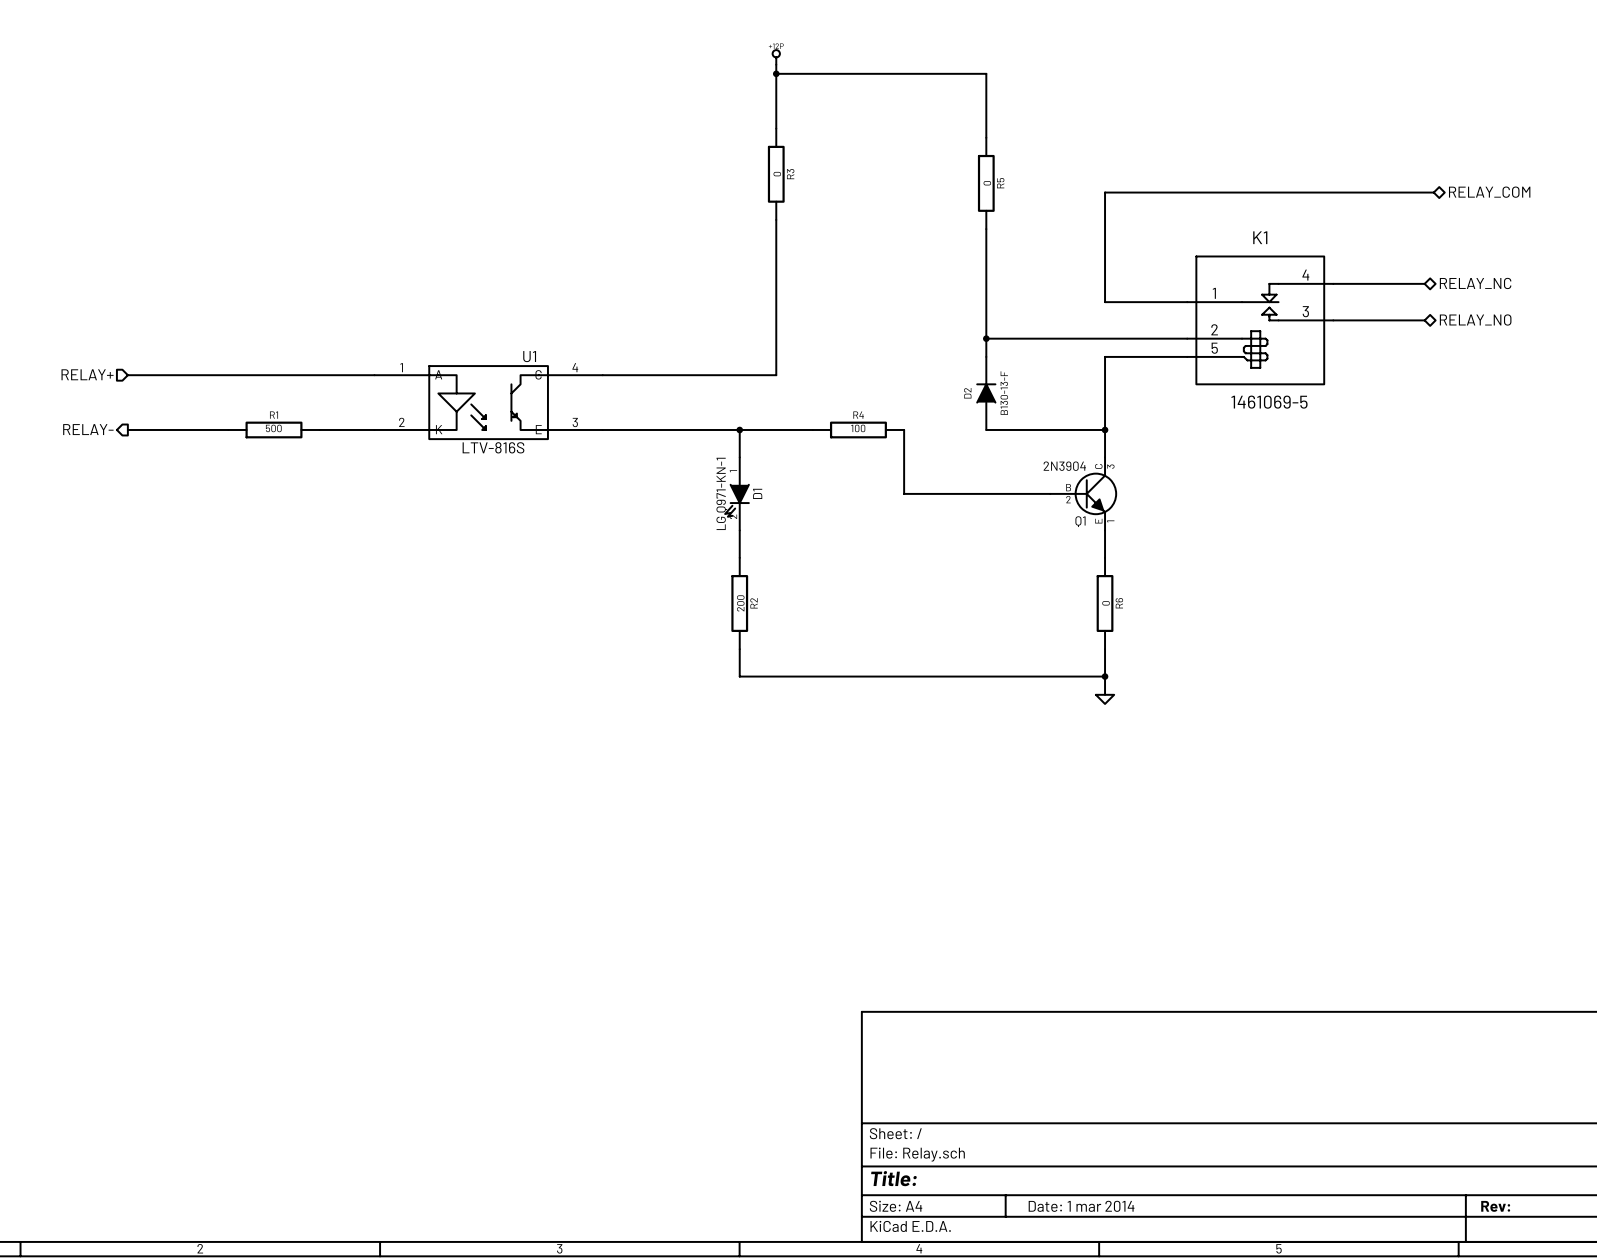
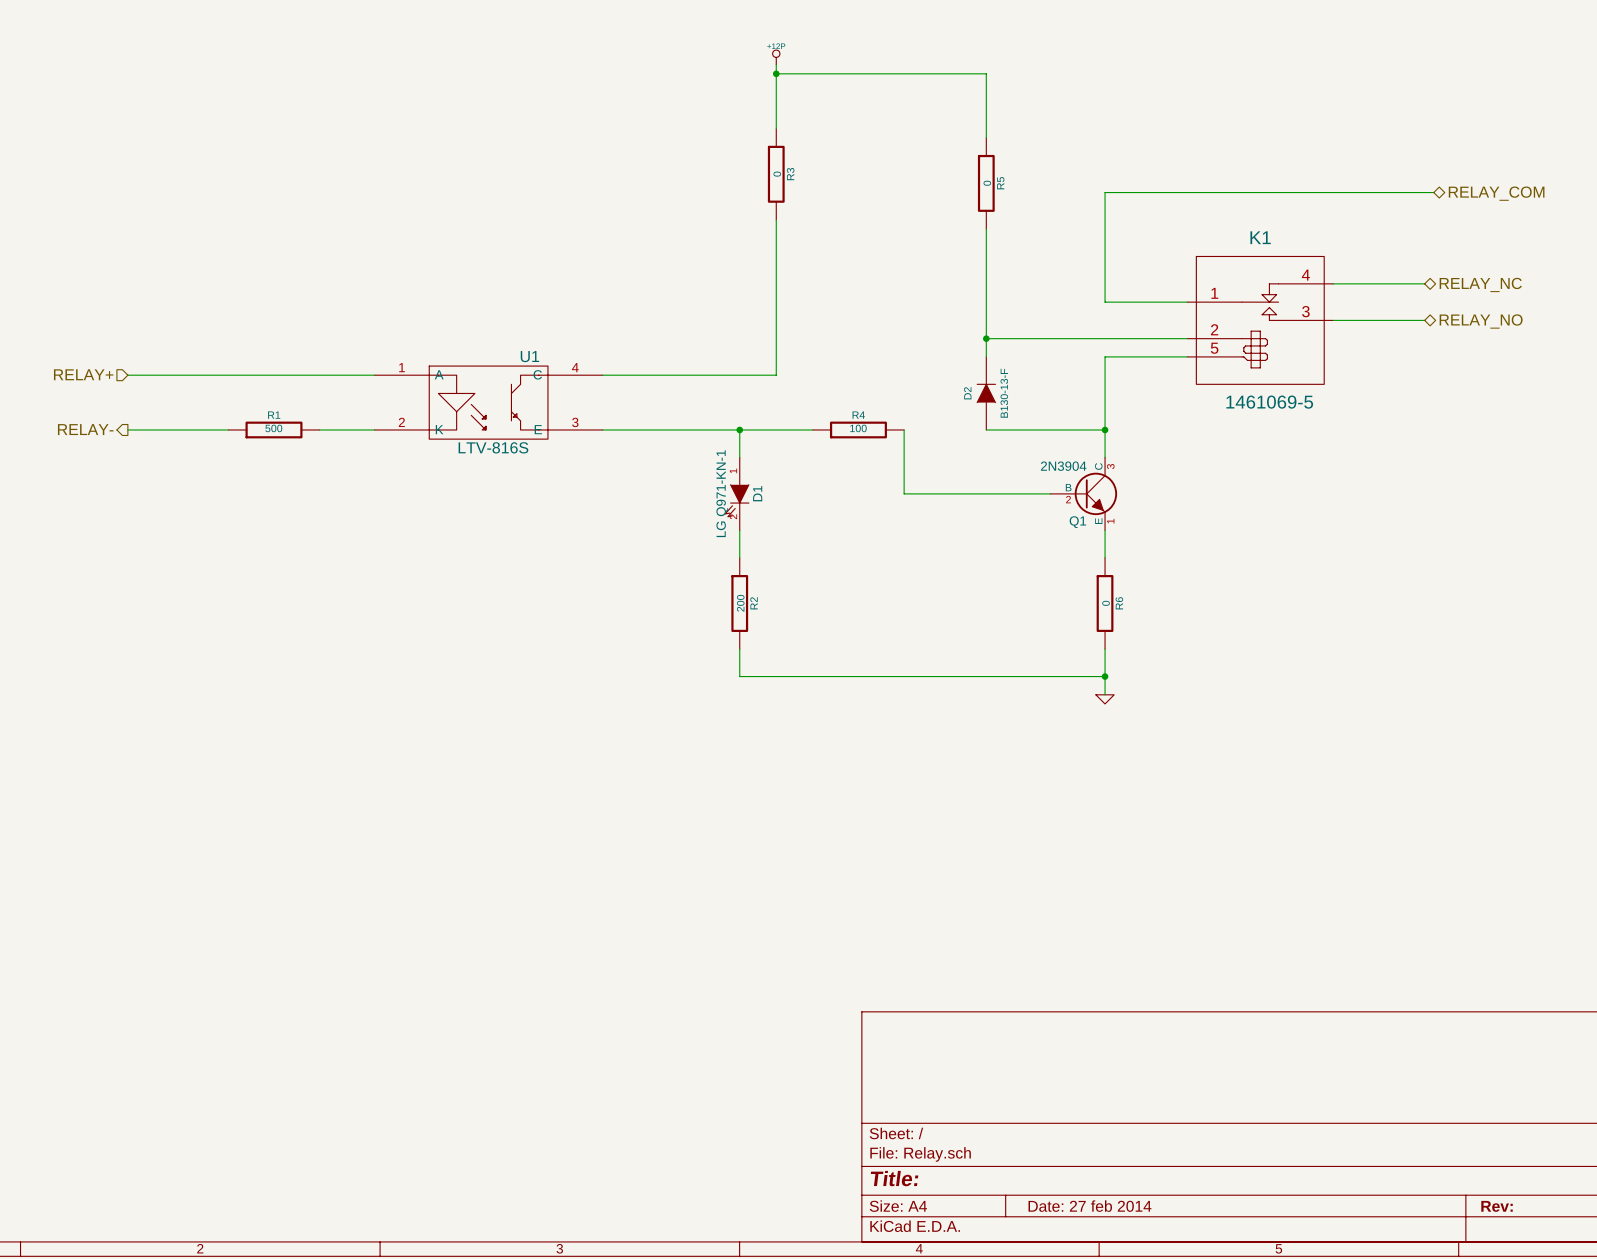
title block: Date: 1 mar 2014 (1081, 1206) -> Date: 27 feb 2014 (1089, 1206)

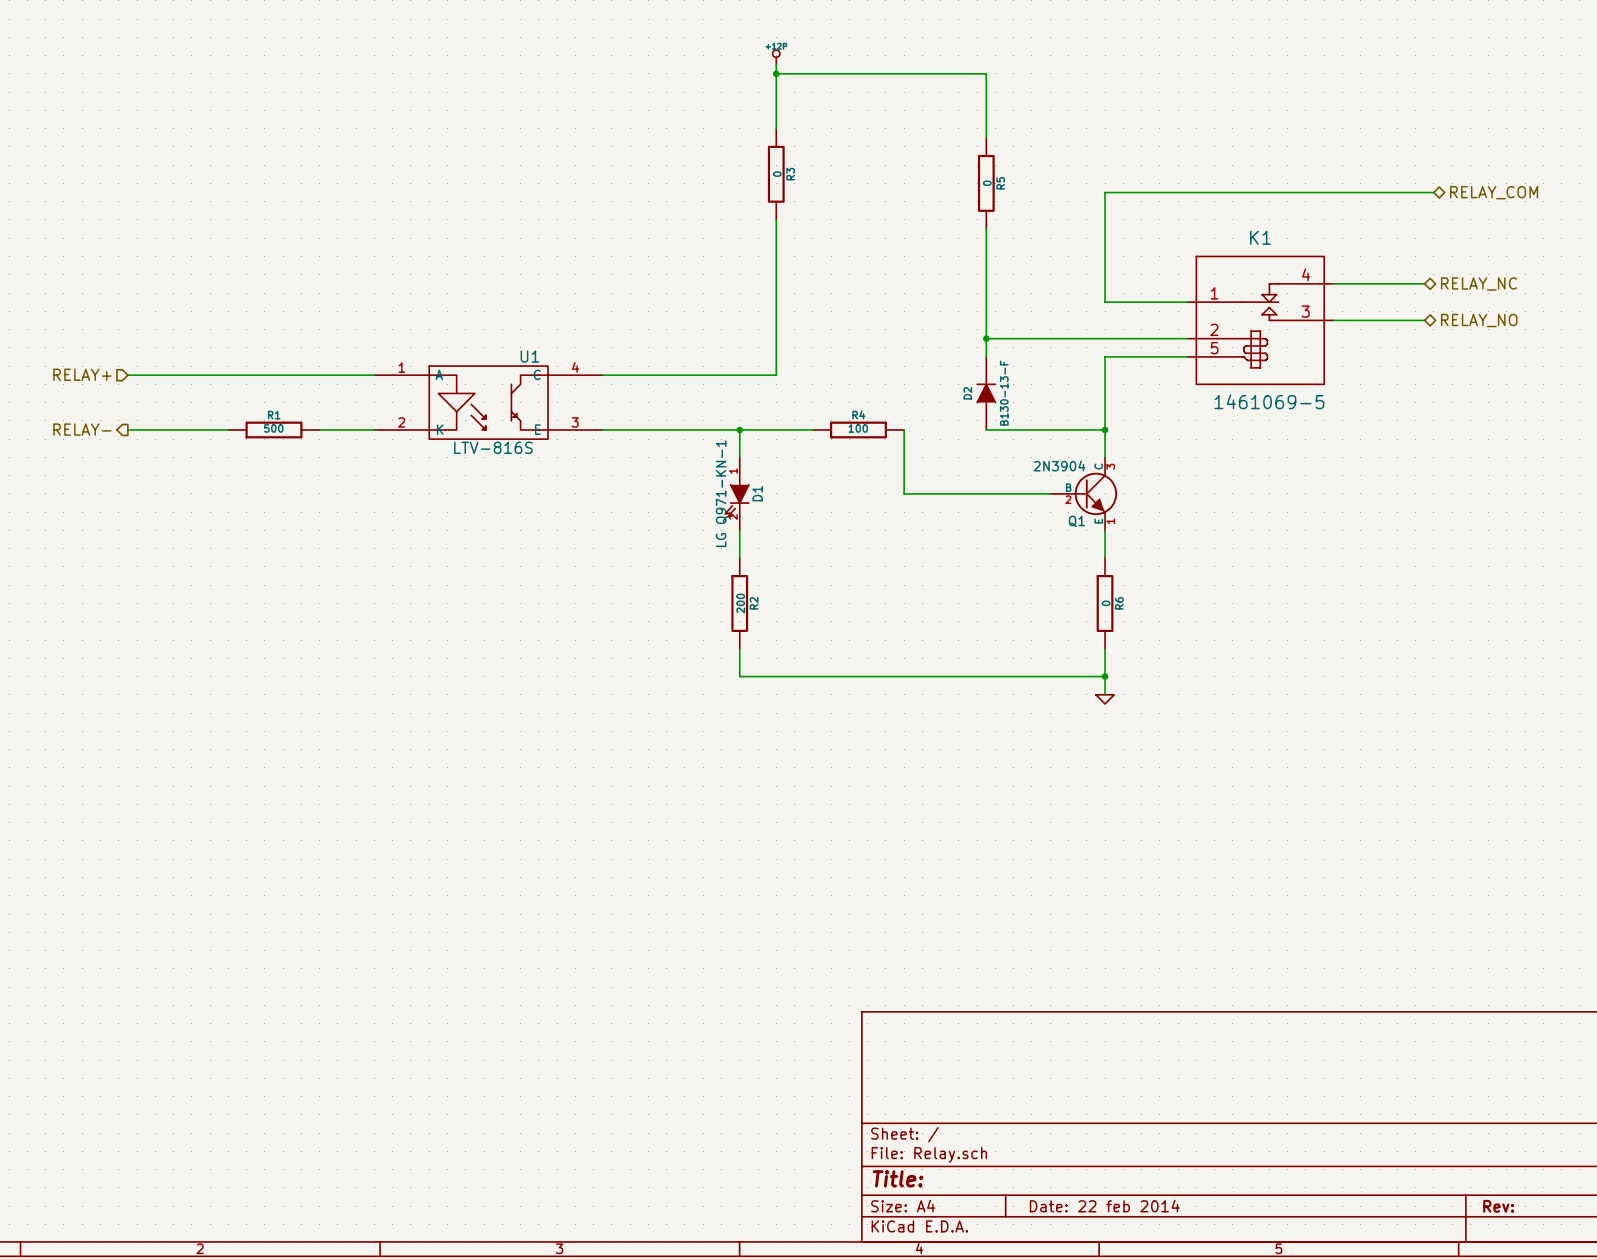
title block: Date: 27 feb 2014 (1089, 1206) -> Date: 22 feb 2014 (1104, 1206)

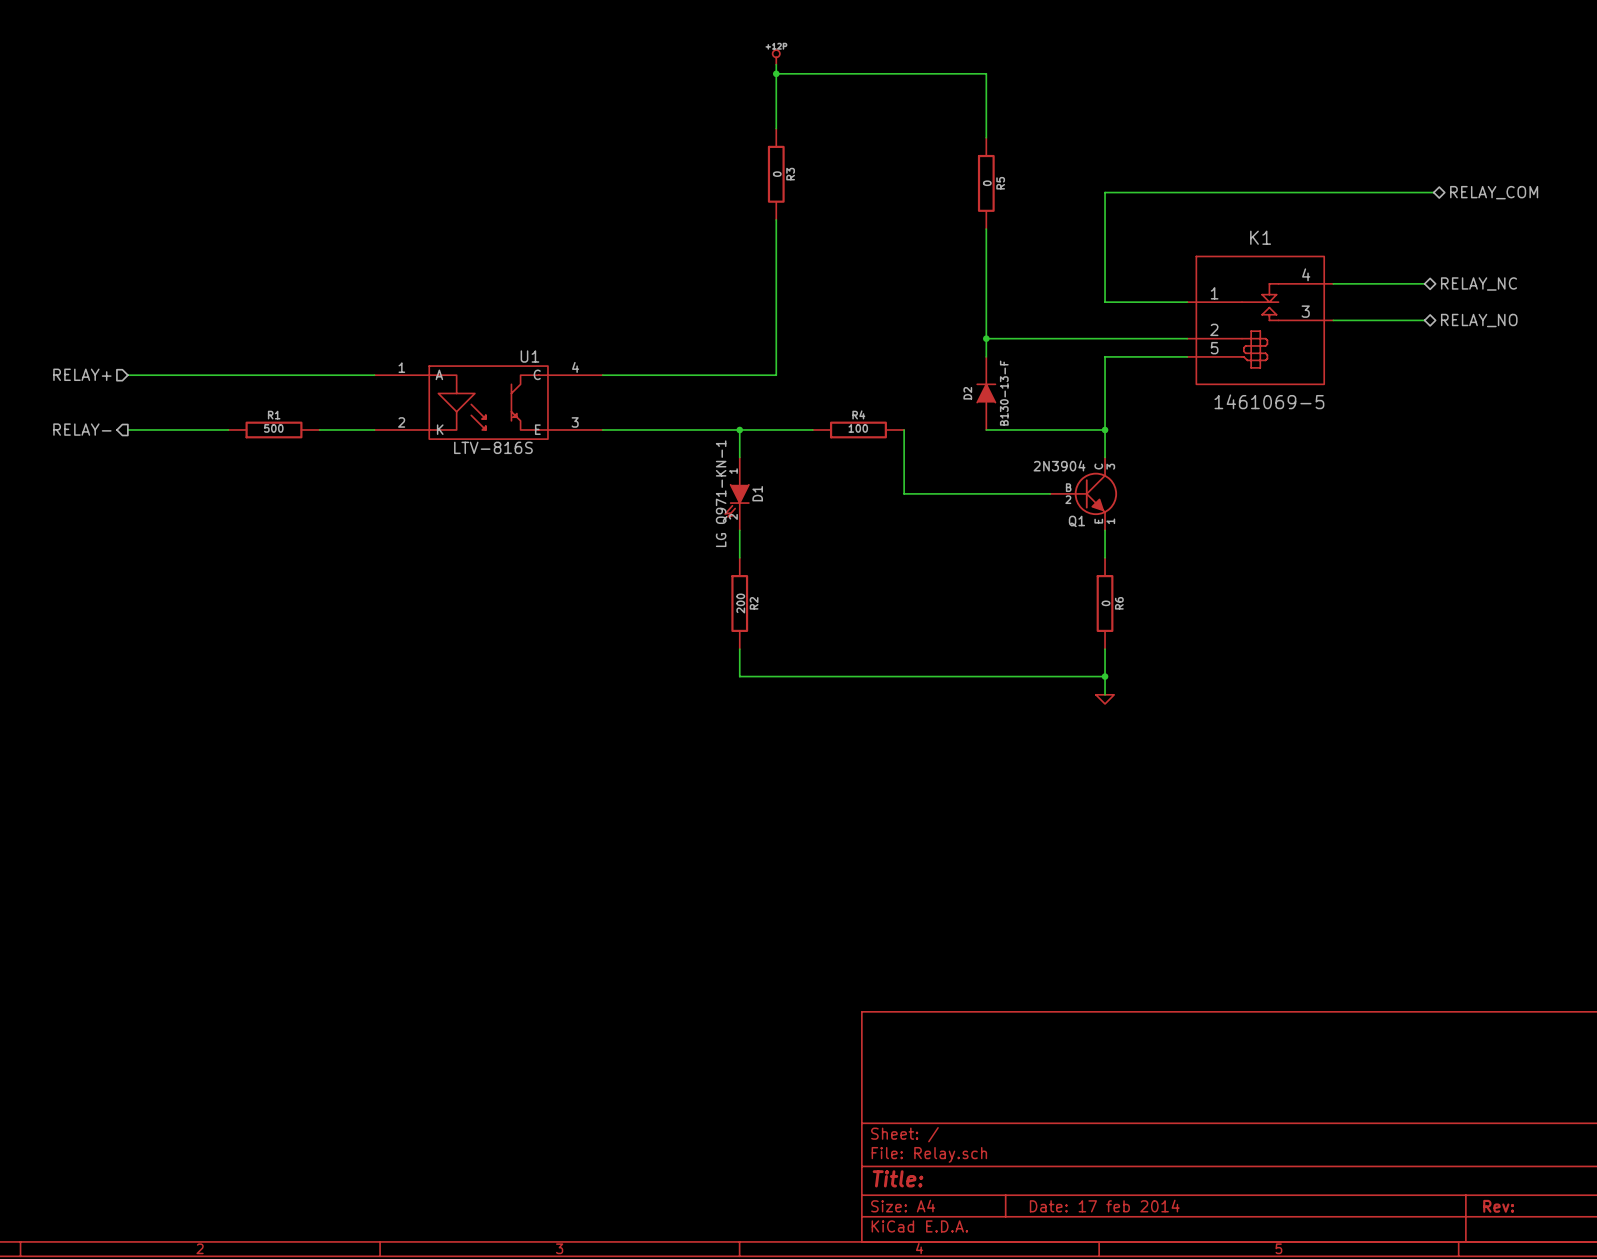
title block: Date: 22 feb 2014 (1104, 1206) -> Date: 17 feb 2014 (1104, 1206)

